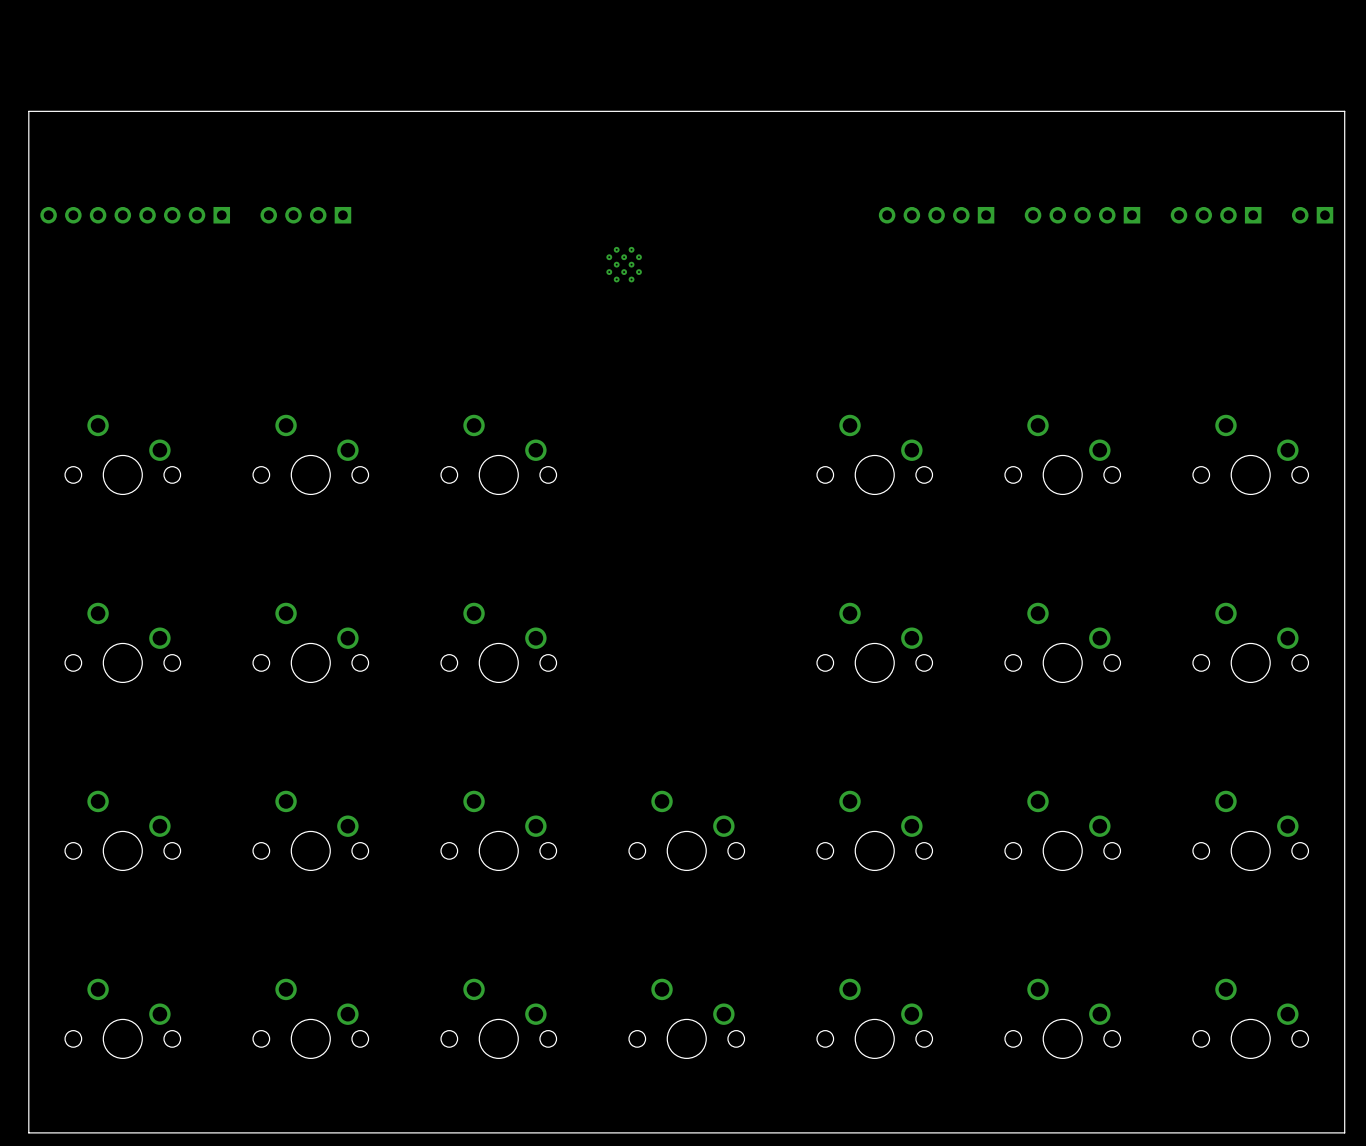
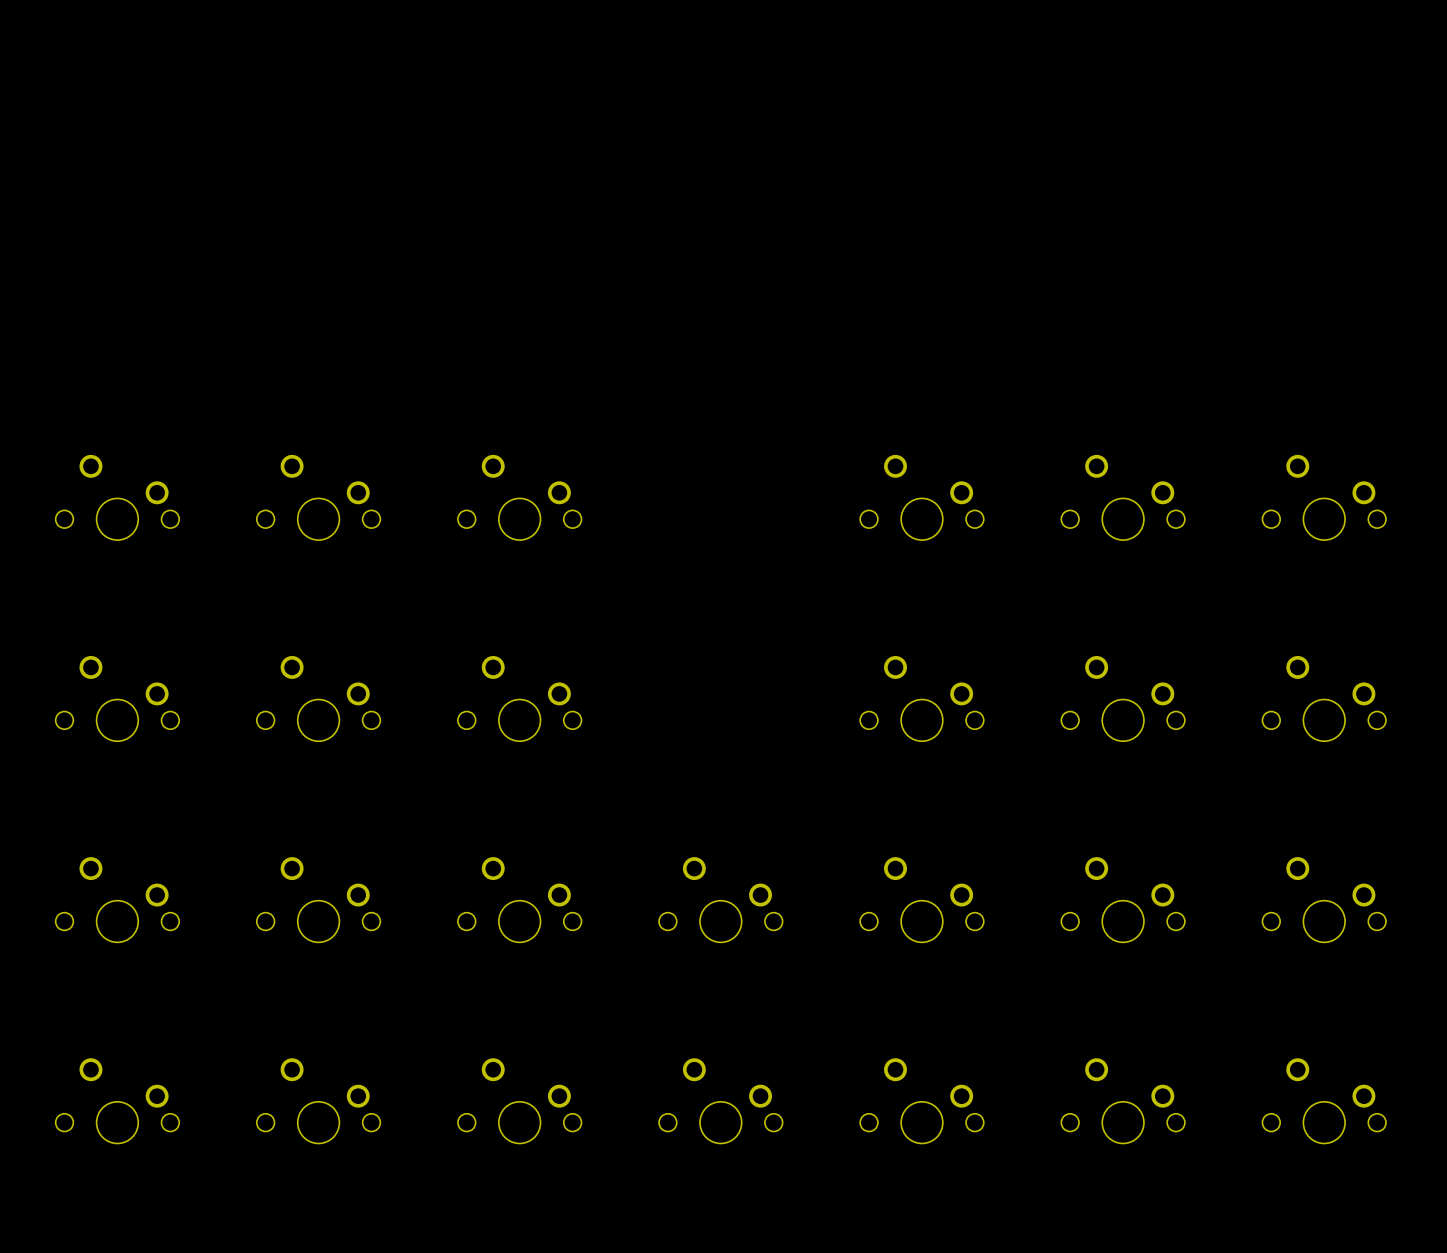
board edge: (1344, 111) (28, 111) (28, 1132) (1344, 1132) (1344, 111) -> none
part: (135, 215) -> none
part: (305, 215) -> none
part: (936, 215) -> none
part: (1082, 215) -> none
part: (1216, 215) -> none
part: (1312, 215) -> none
part: (624, 264) -> none

